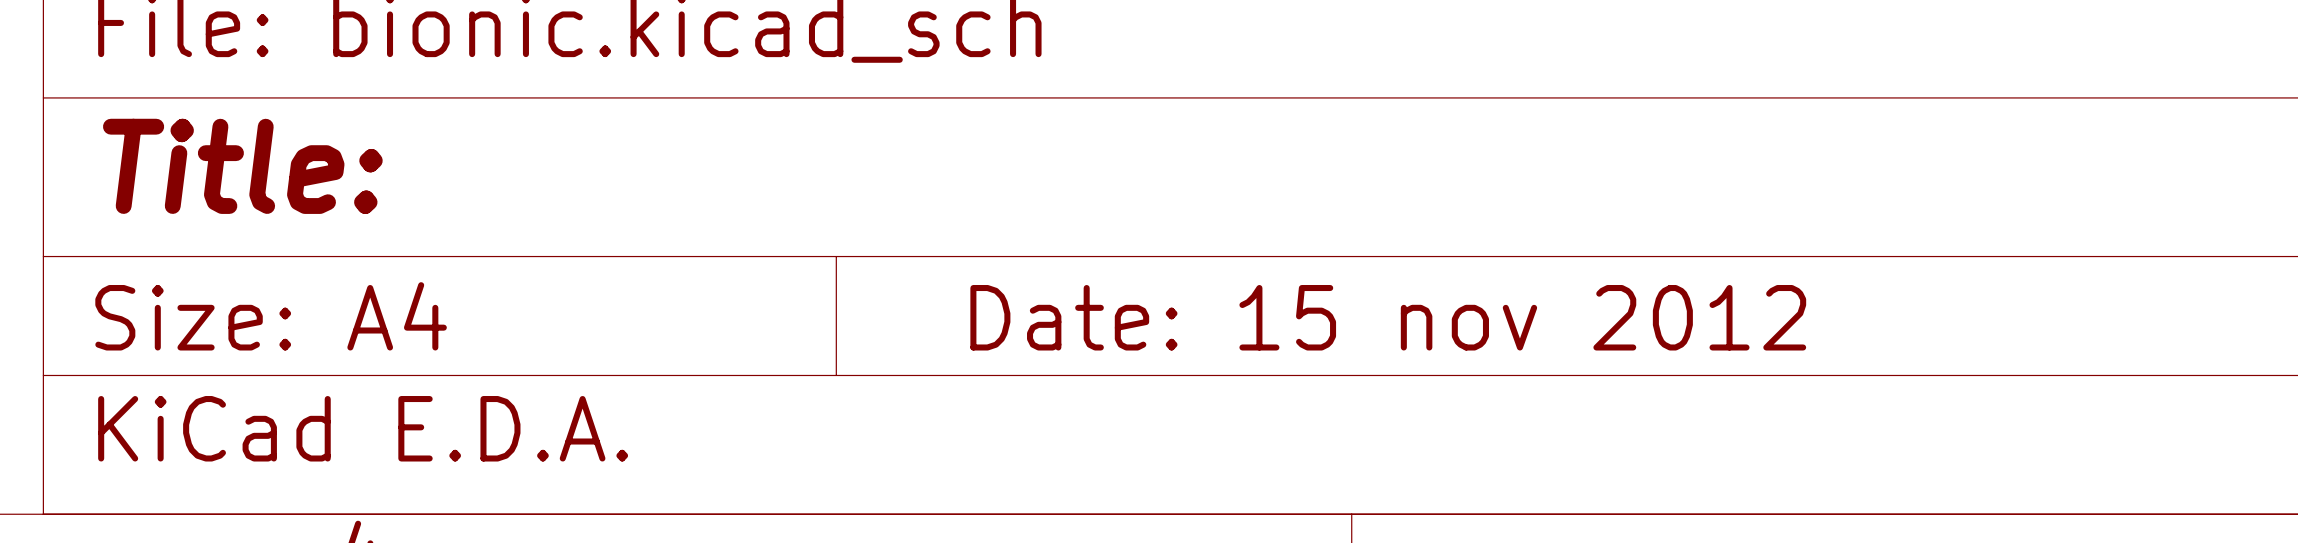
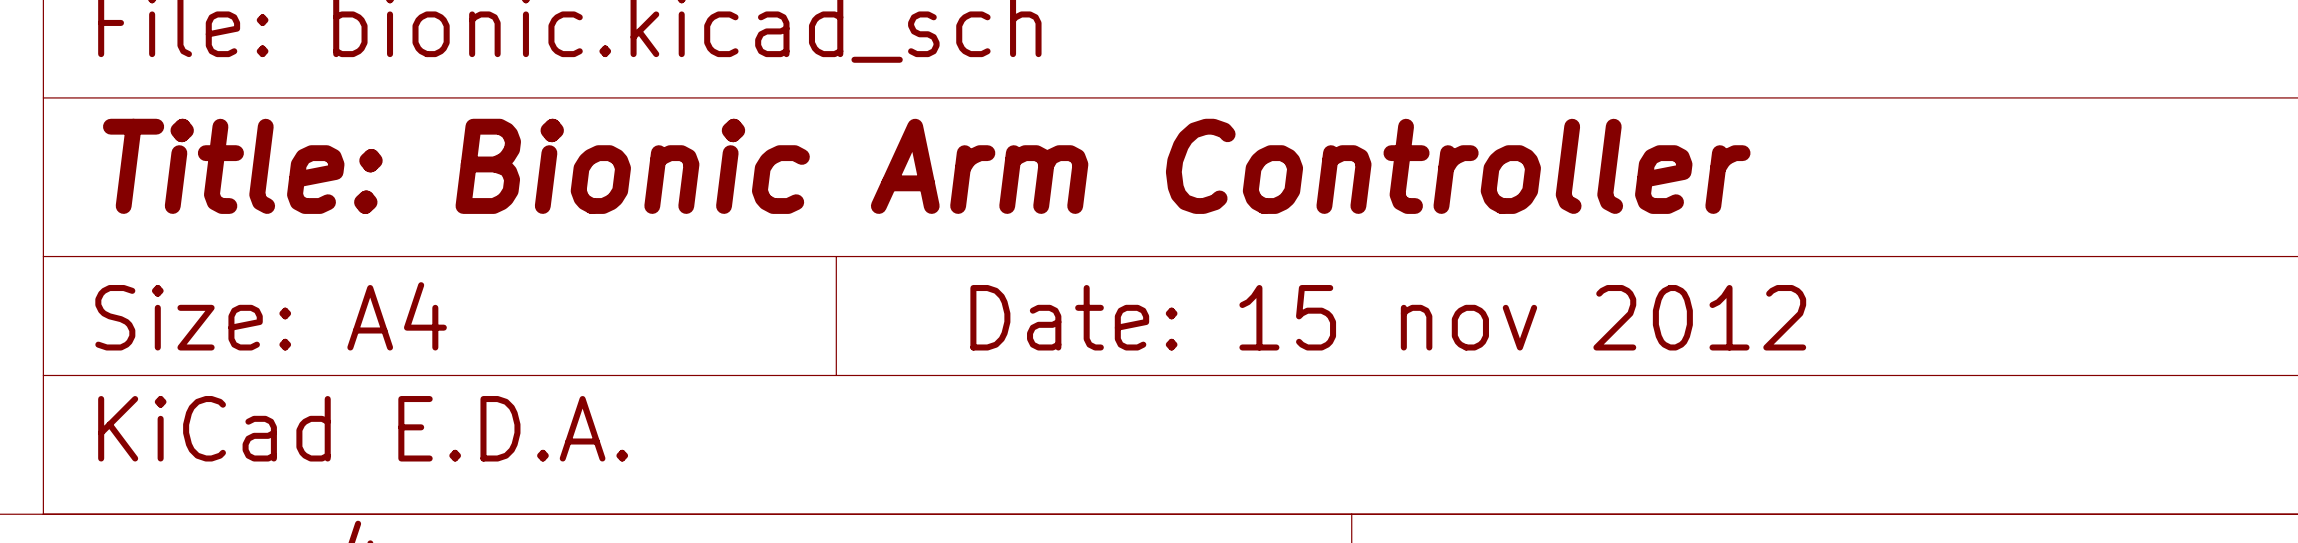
title block: Title: (242, 166) -> Title: Bionic Arm Controller (926, 166)

